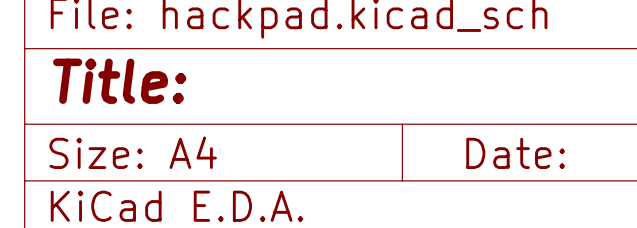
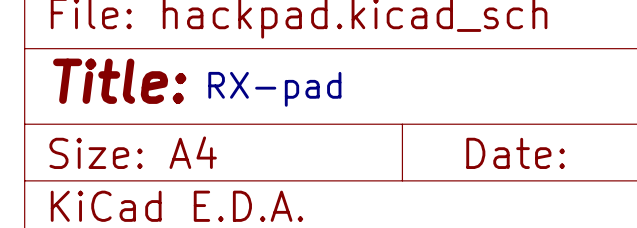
text: none -> RX-pad (274, 89)

